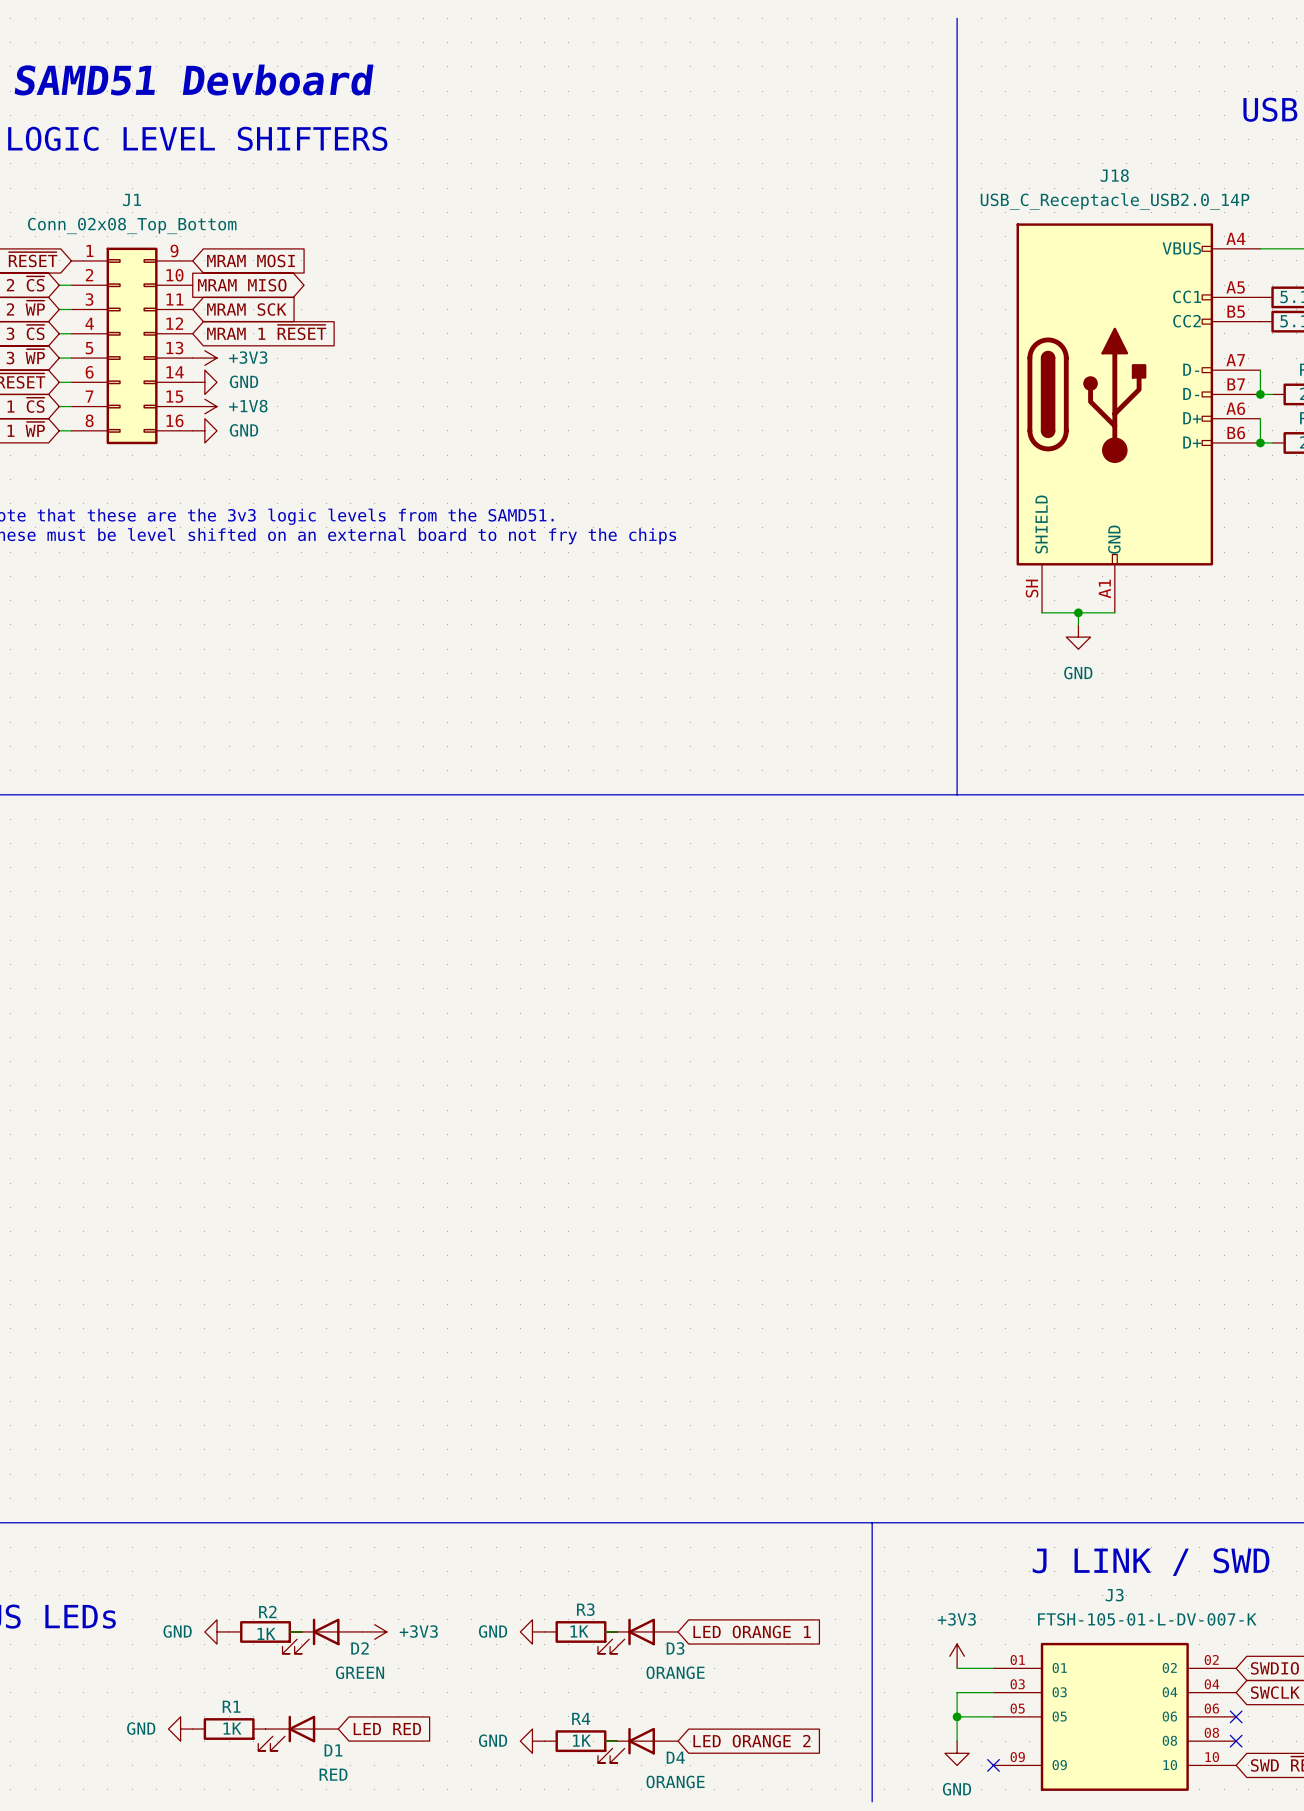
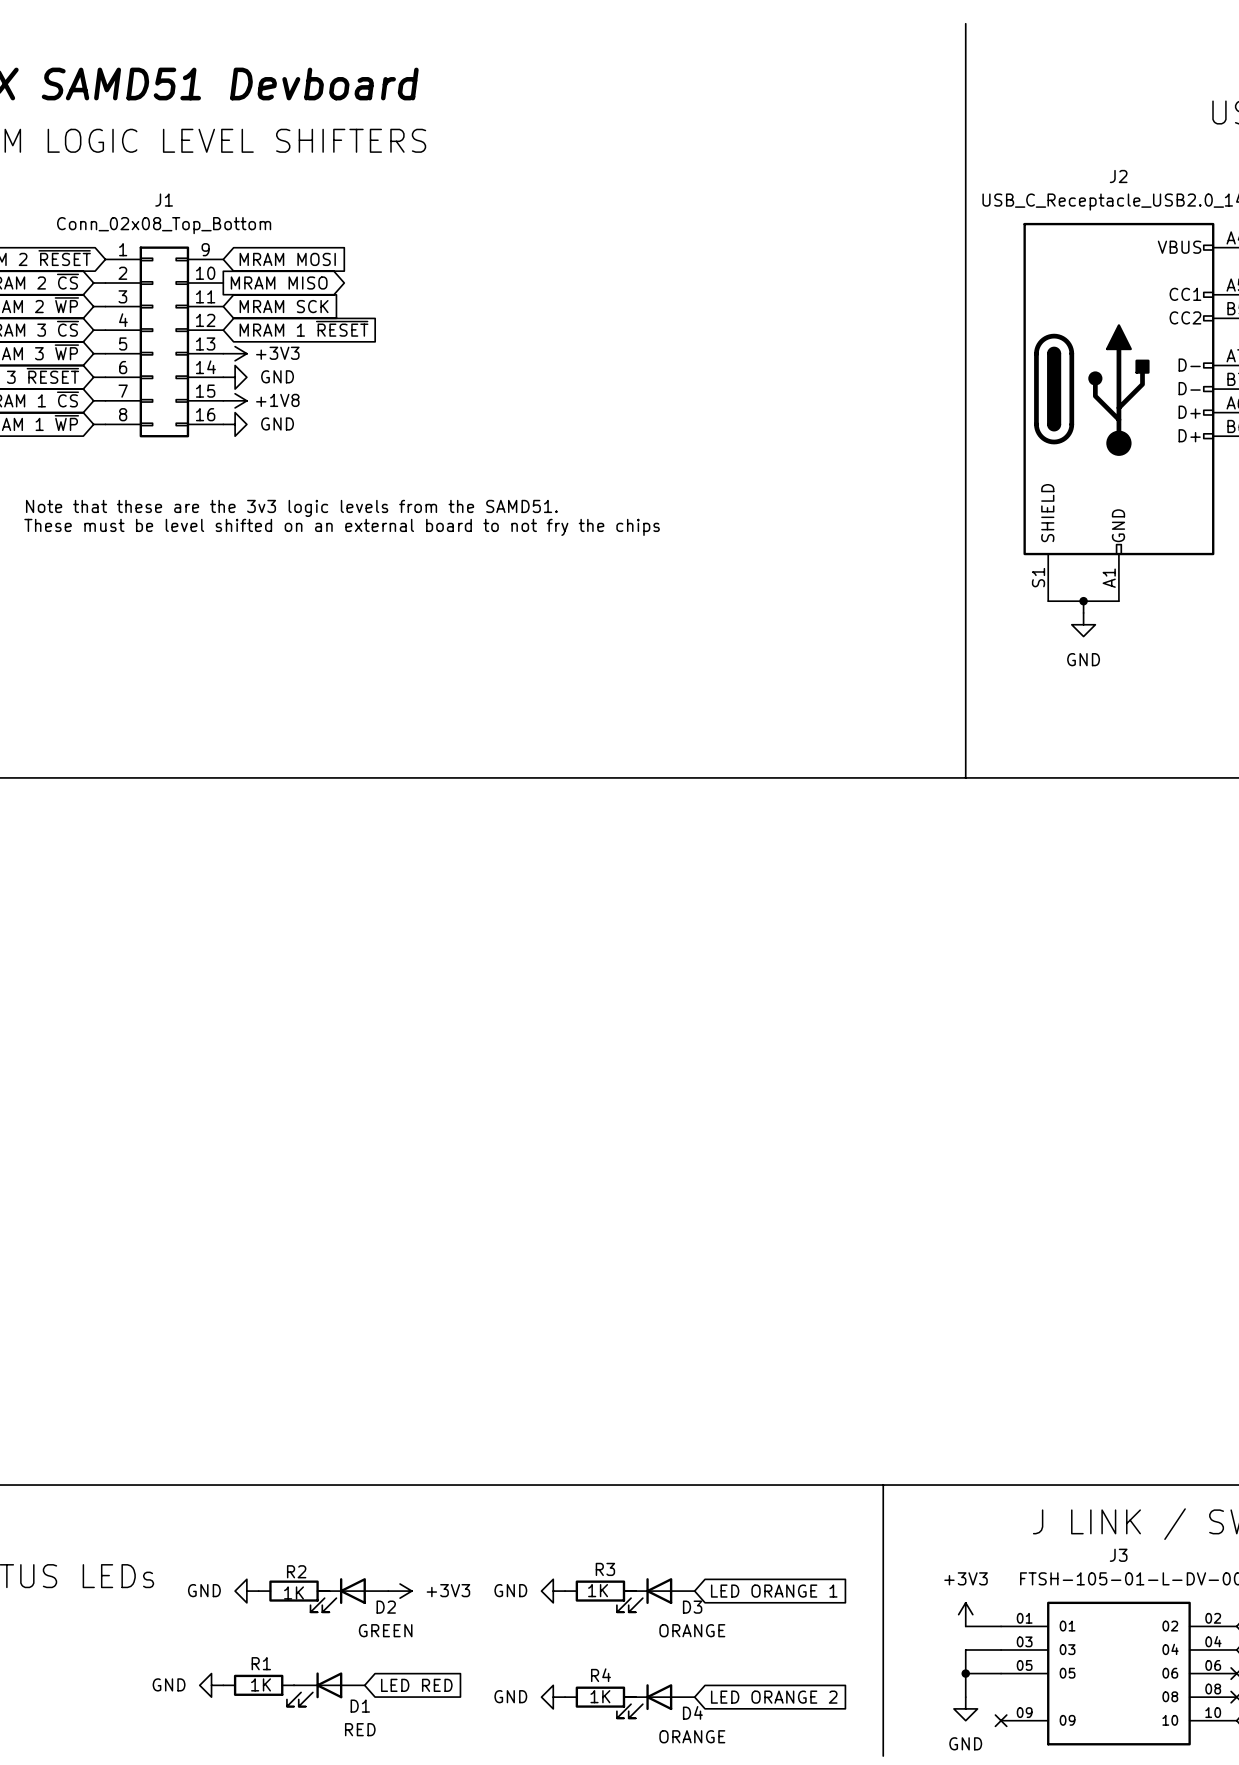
J18 name: J18 (1114, 175) -> J2 (1118, 176)
J18 pin number: SH (1032, 588) -> S1 (1038, 577)

